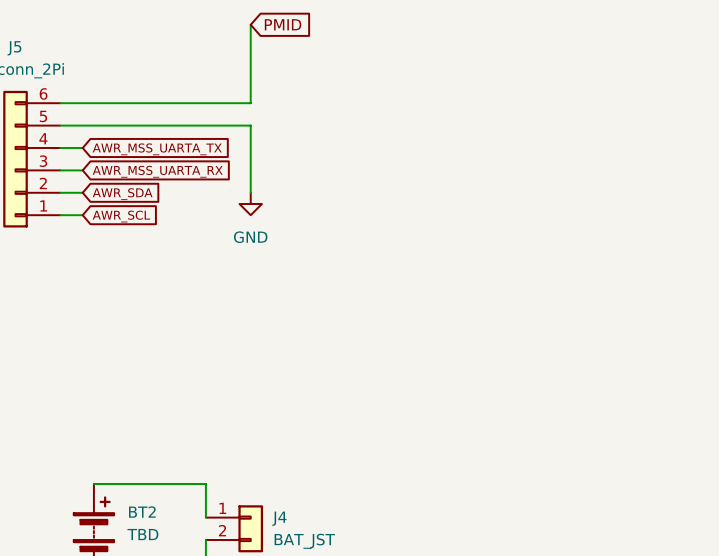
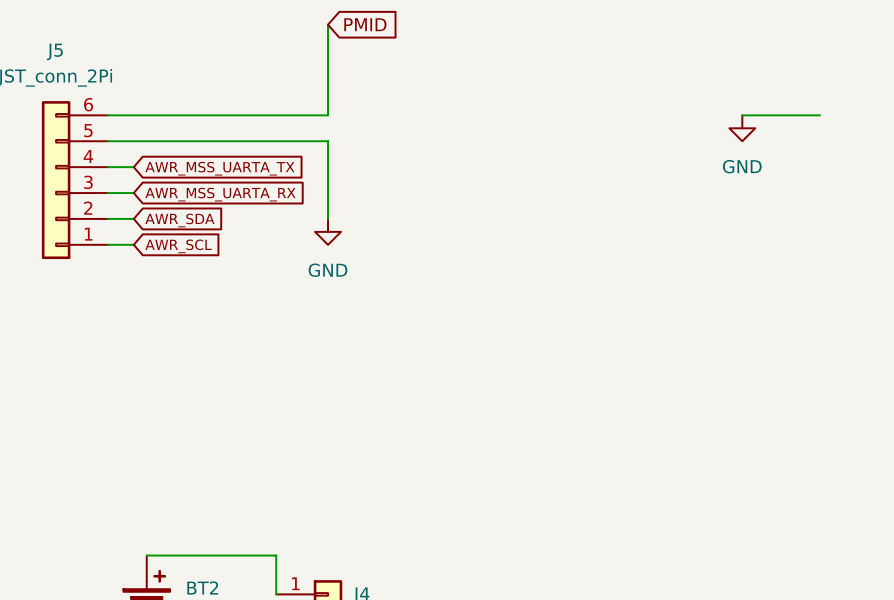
wire: none -> (742, 115) (819, 115)
power symbol: none -> GND (742, 128)

